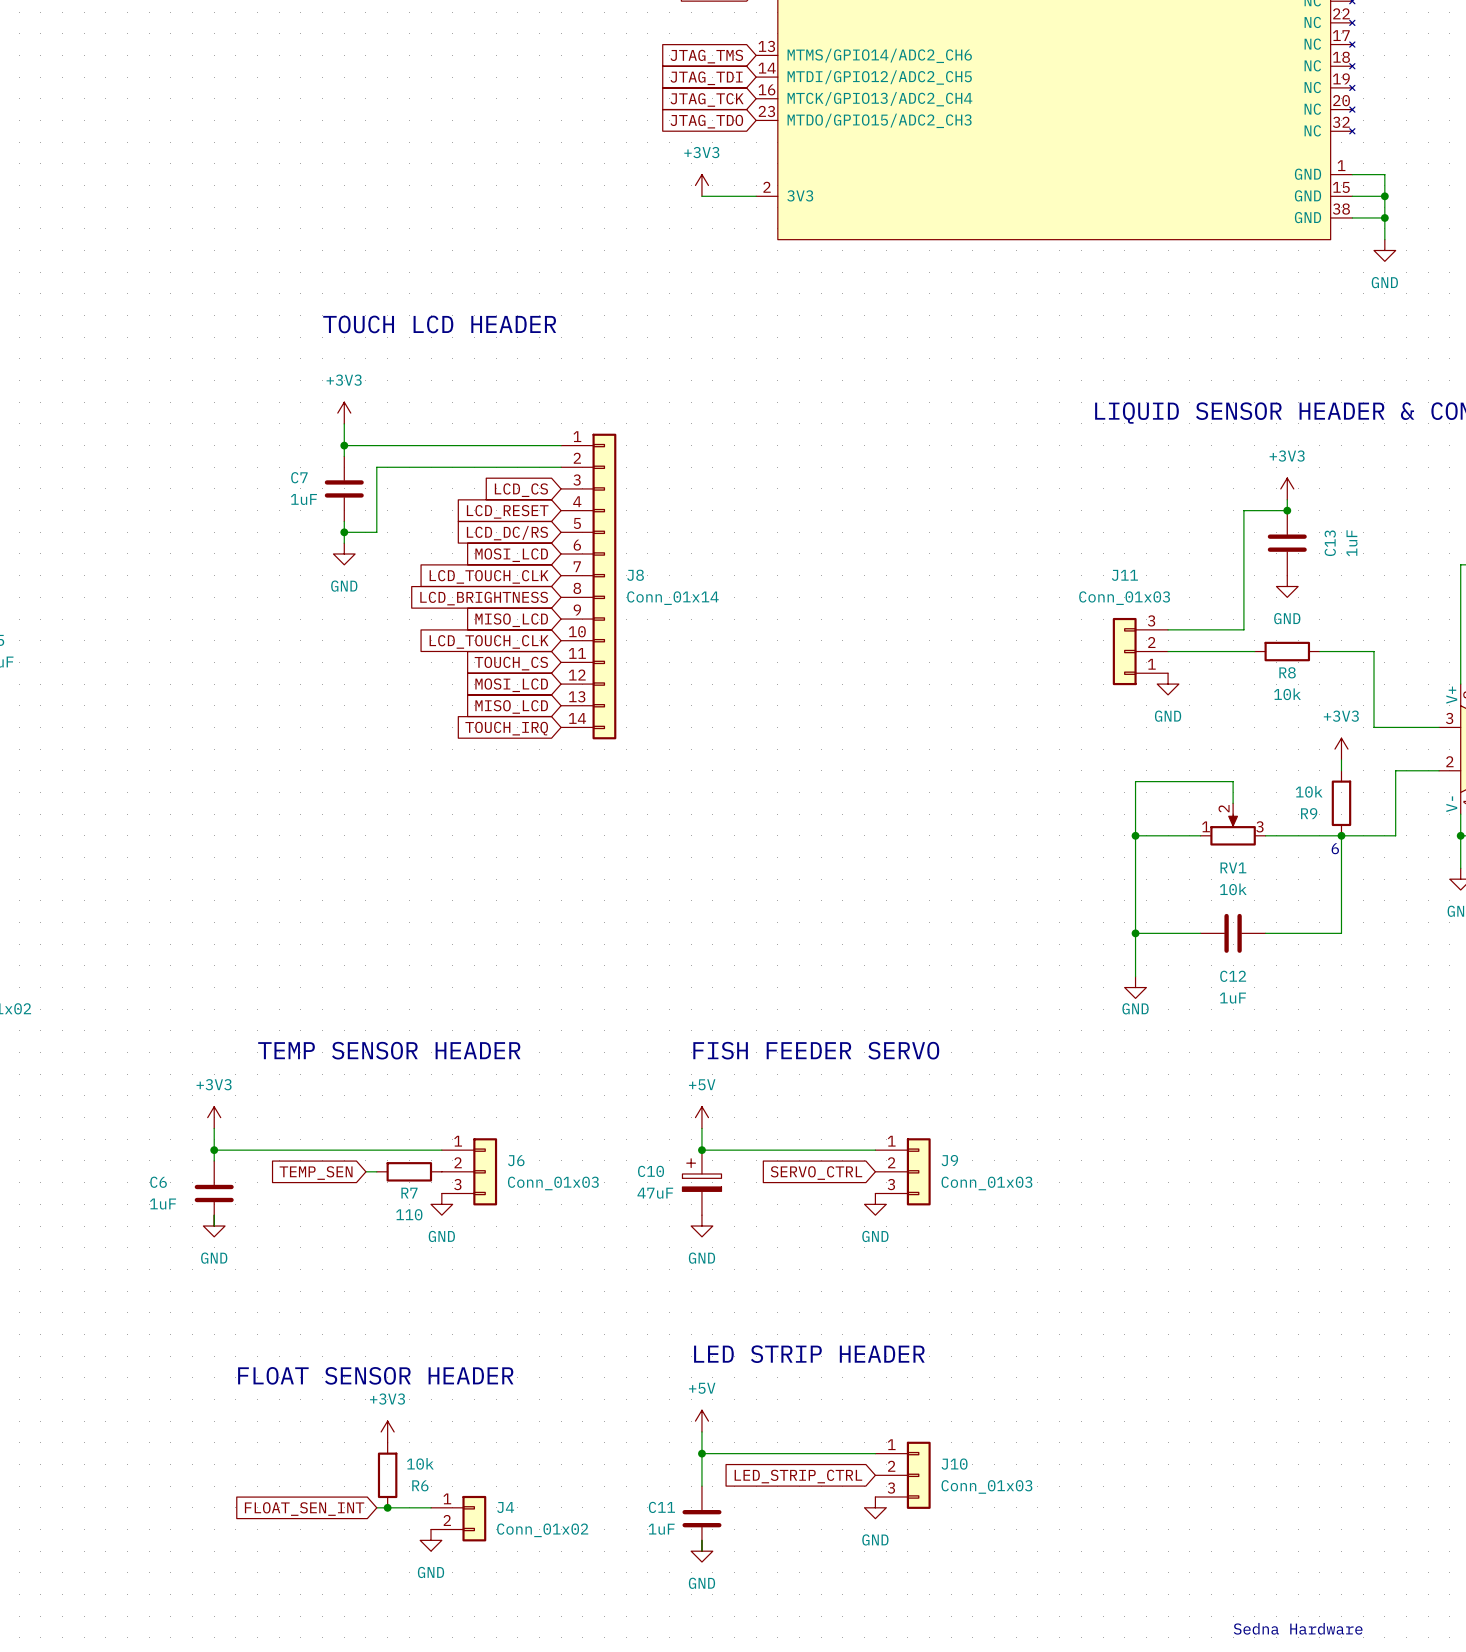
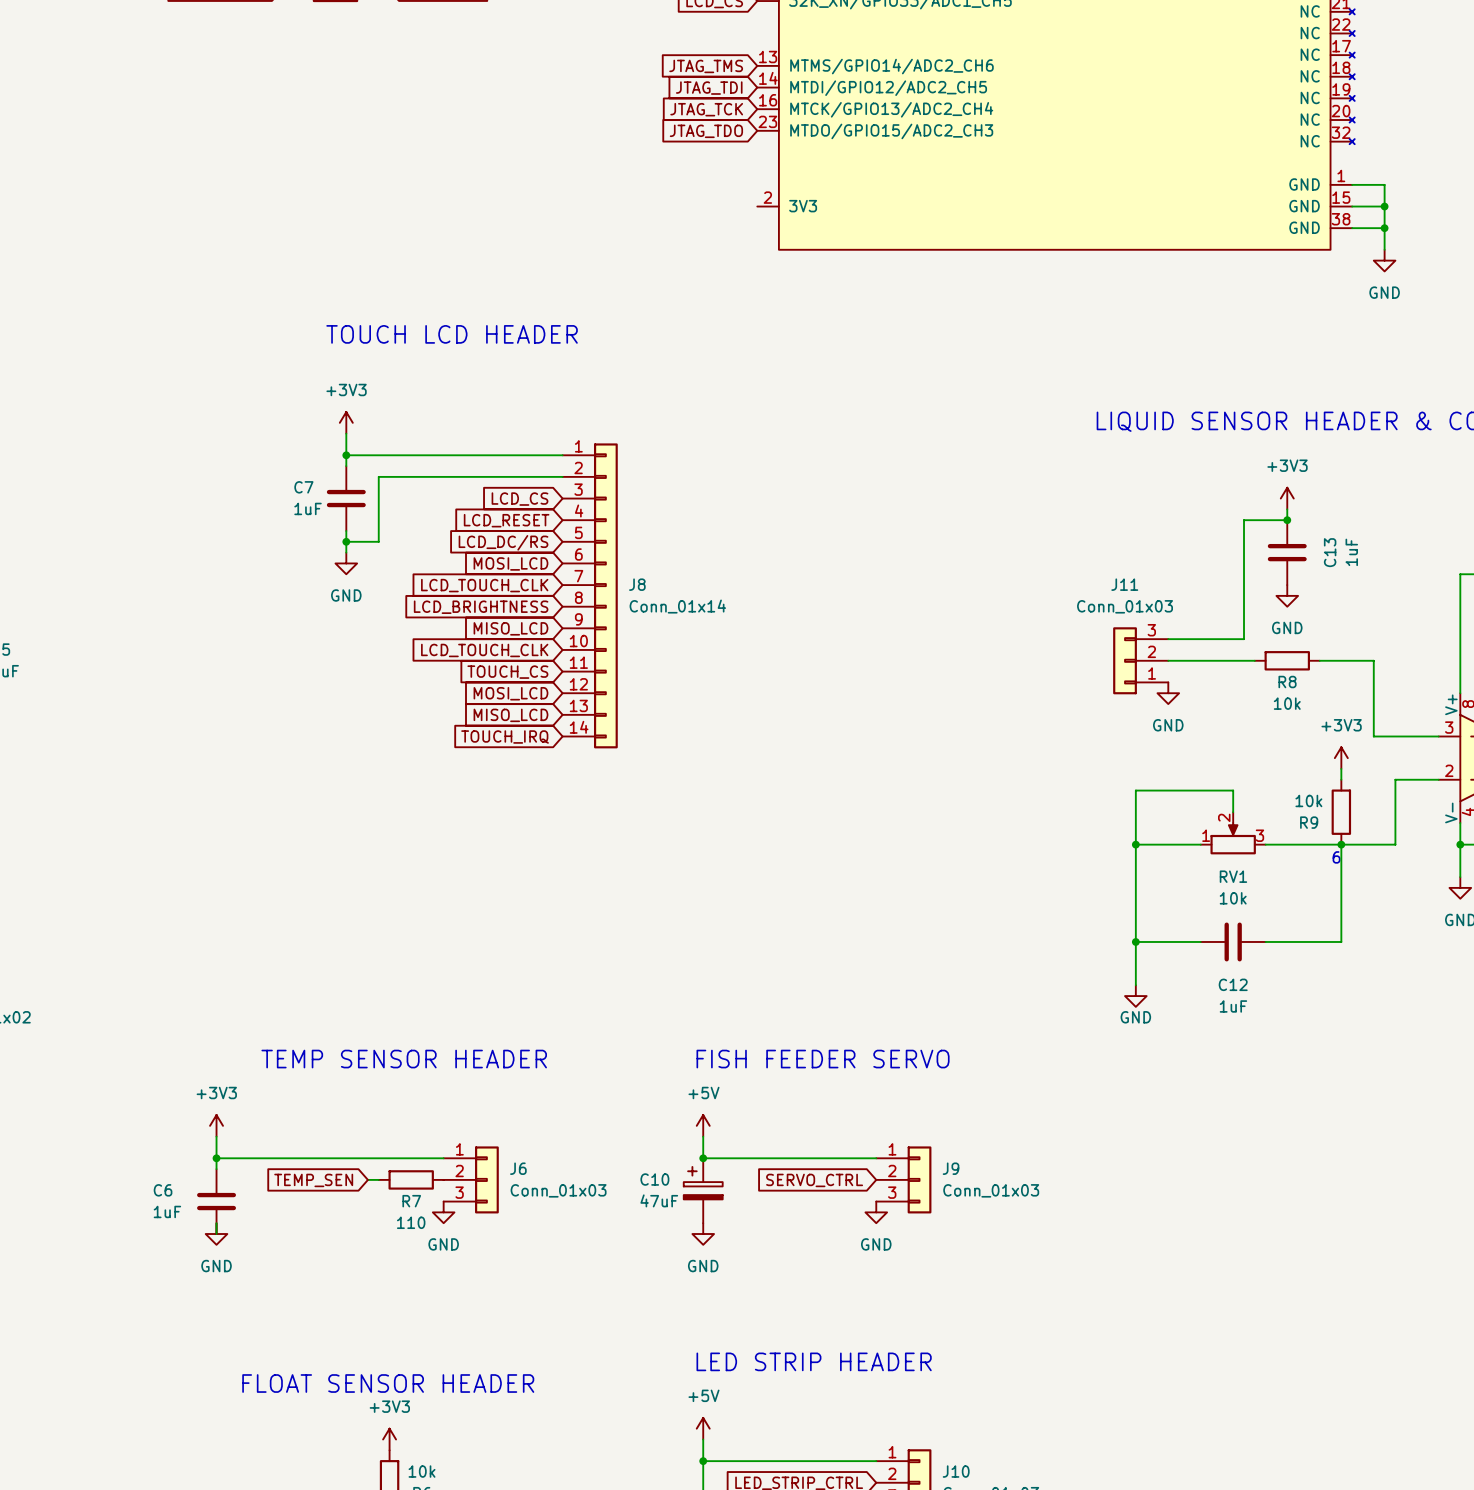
power symbol: +3V3 (701, 185) -> none
wire: (701, 196) (756, 196) -> none

